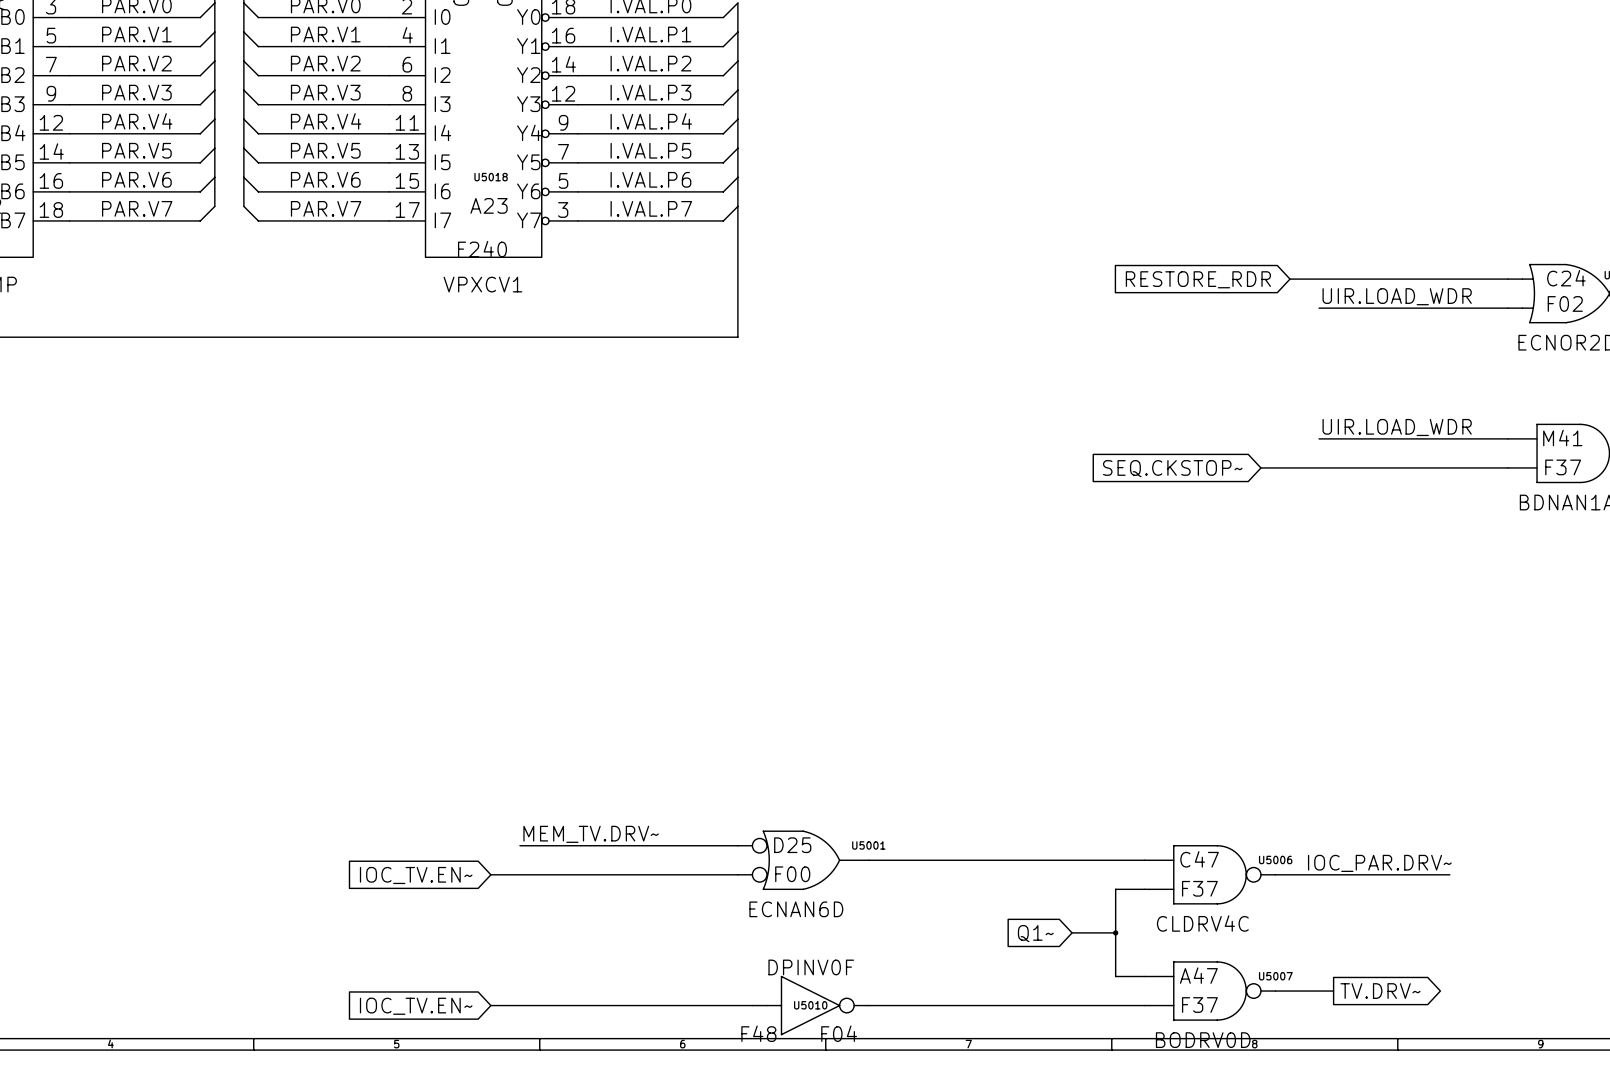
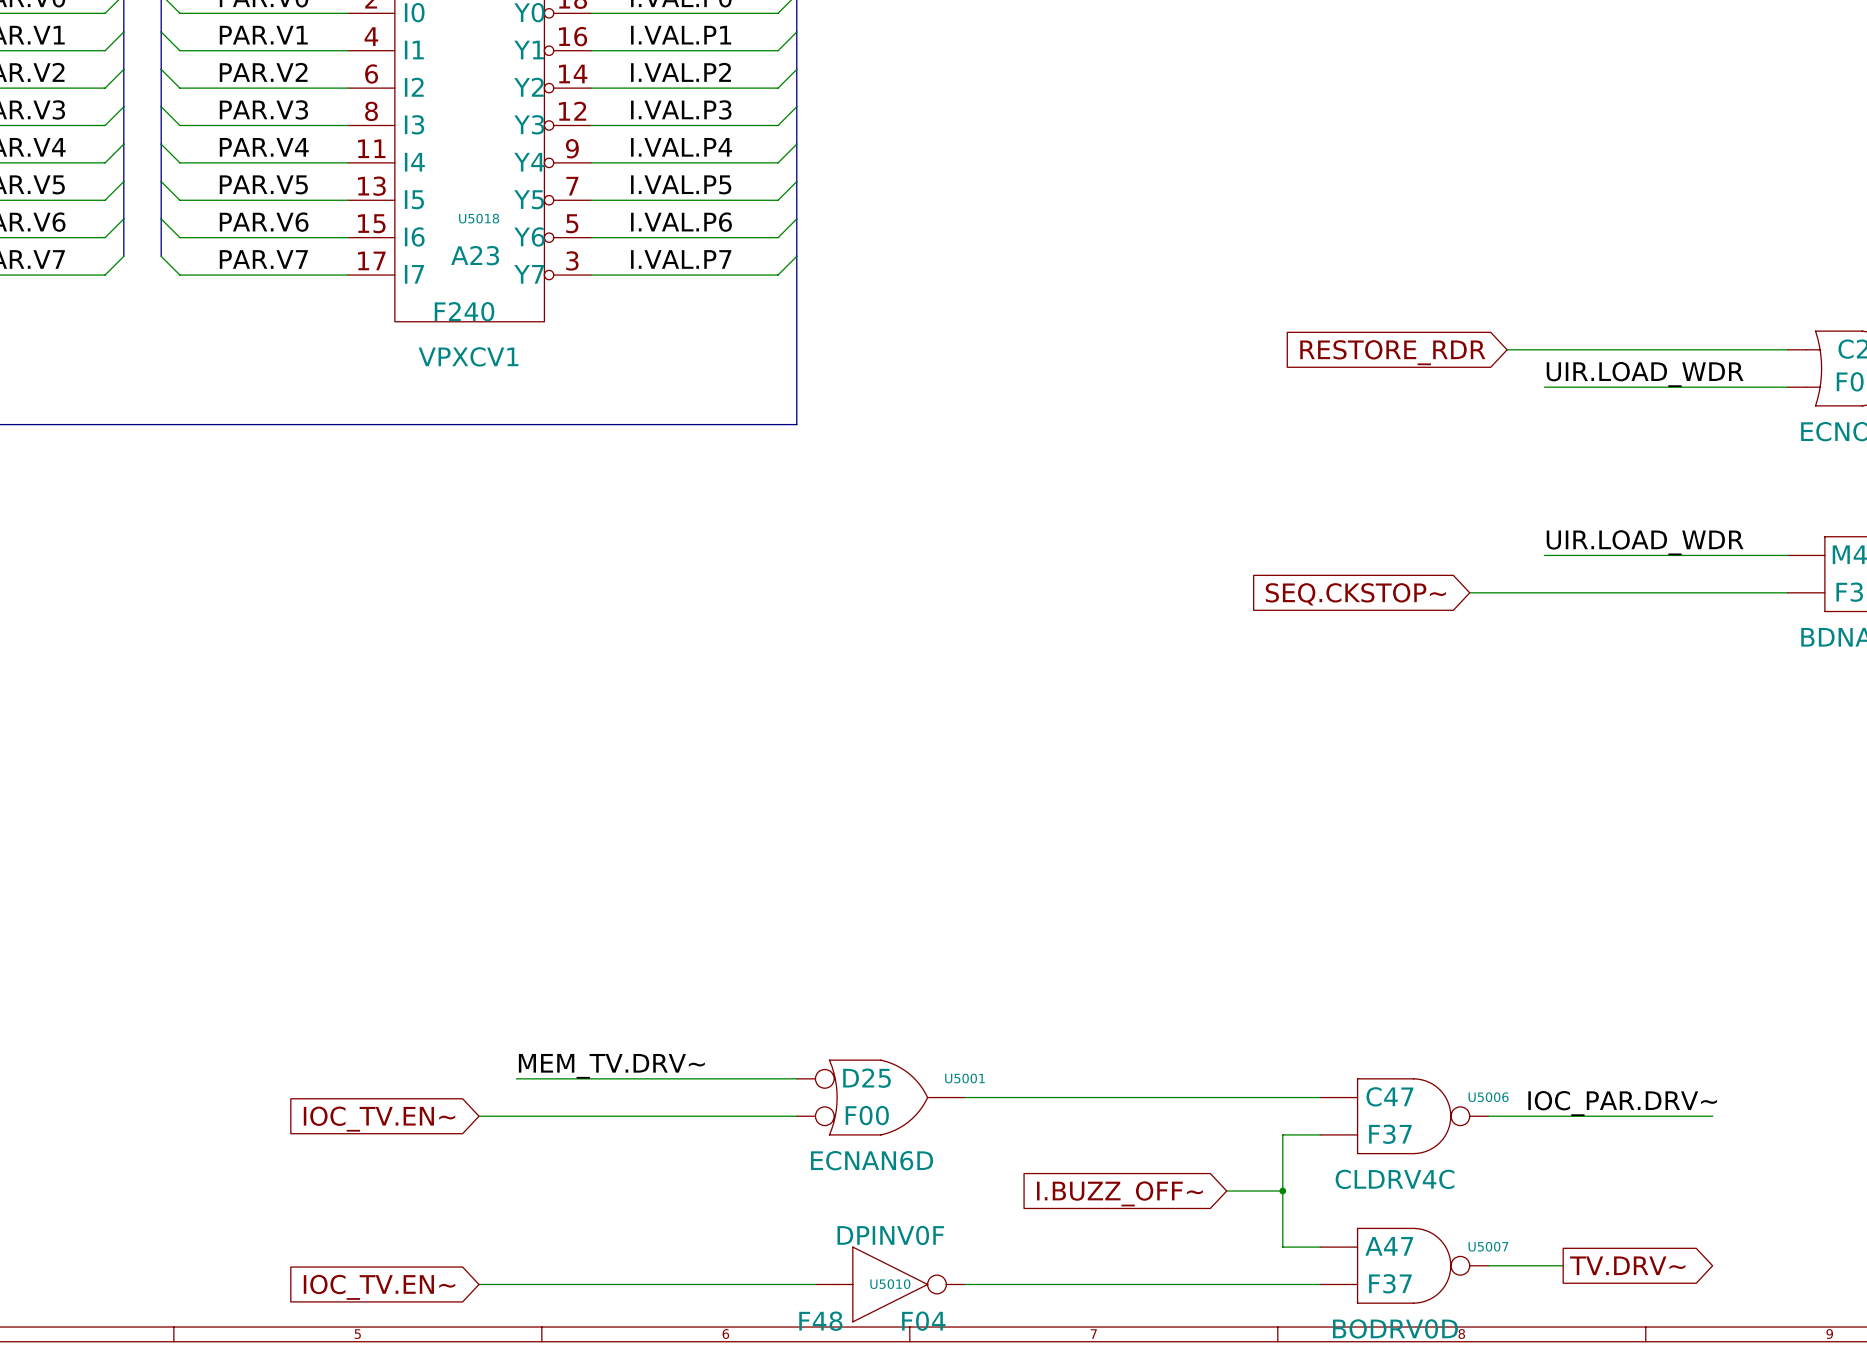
global label: Q1~ (1035, 933) -> I.BUZZ_OFF~ (1119, 1193)

